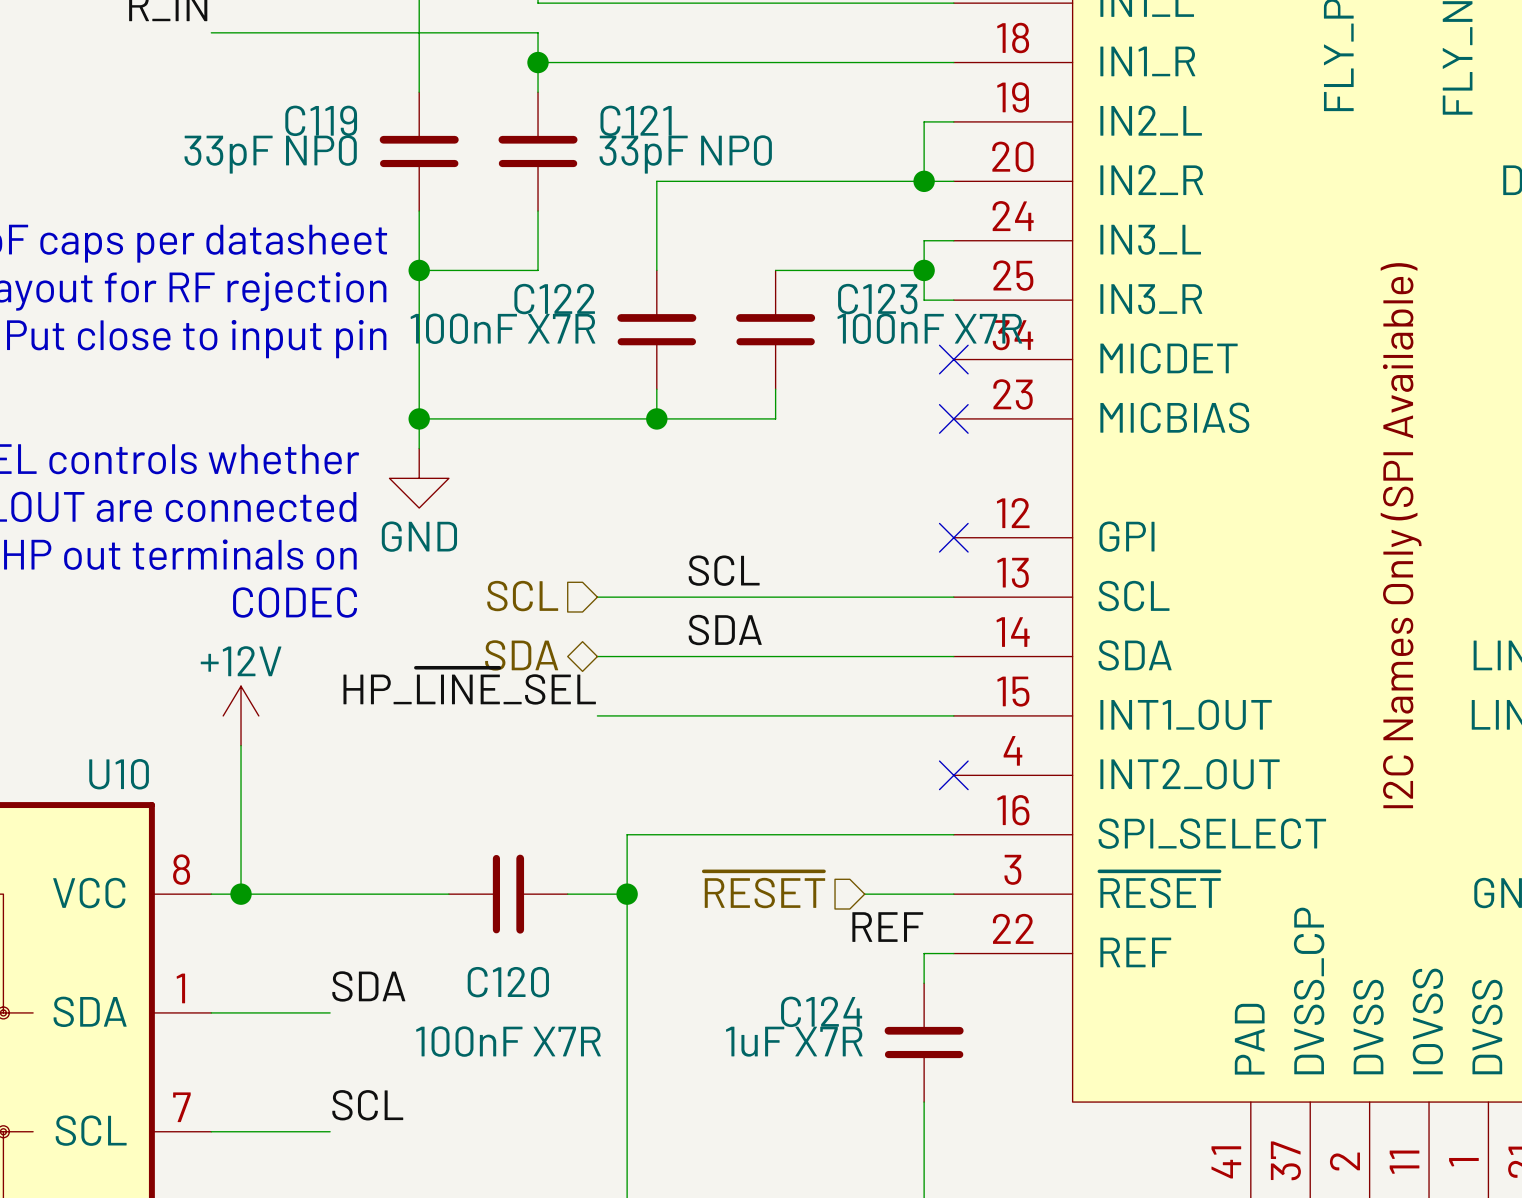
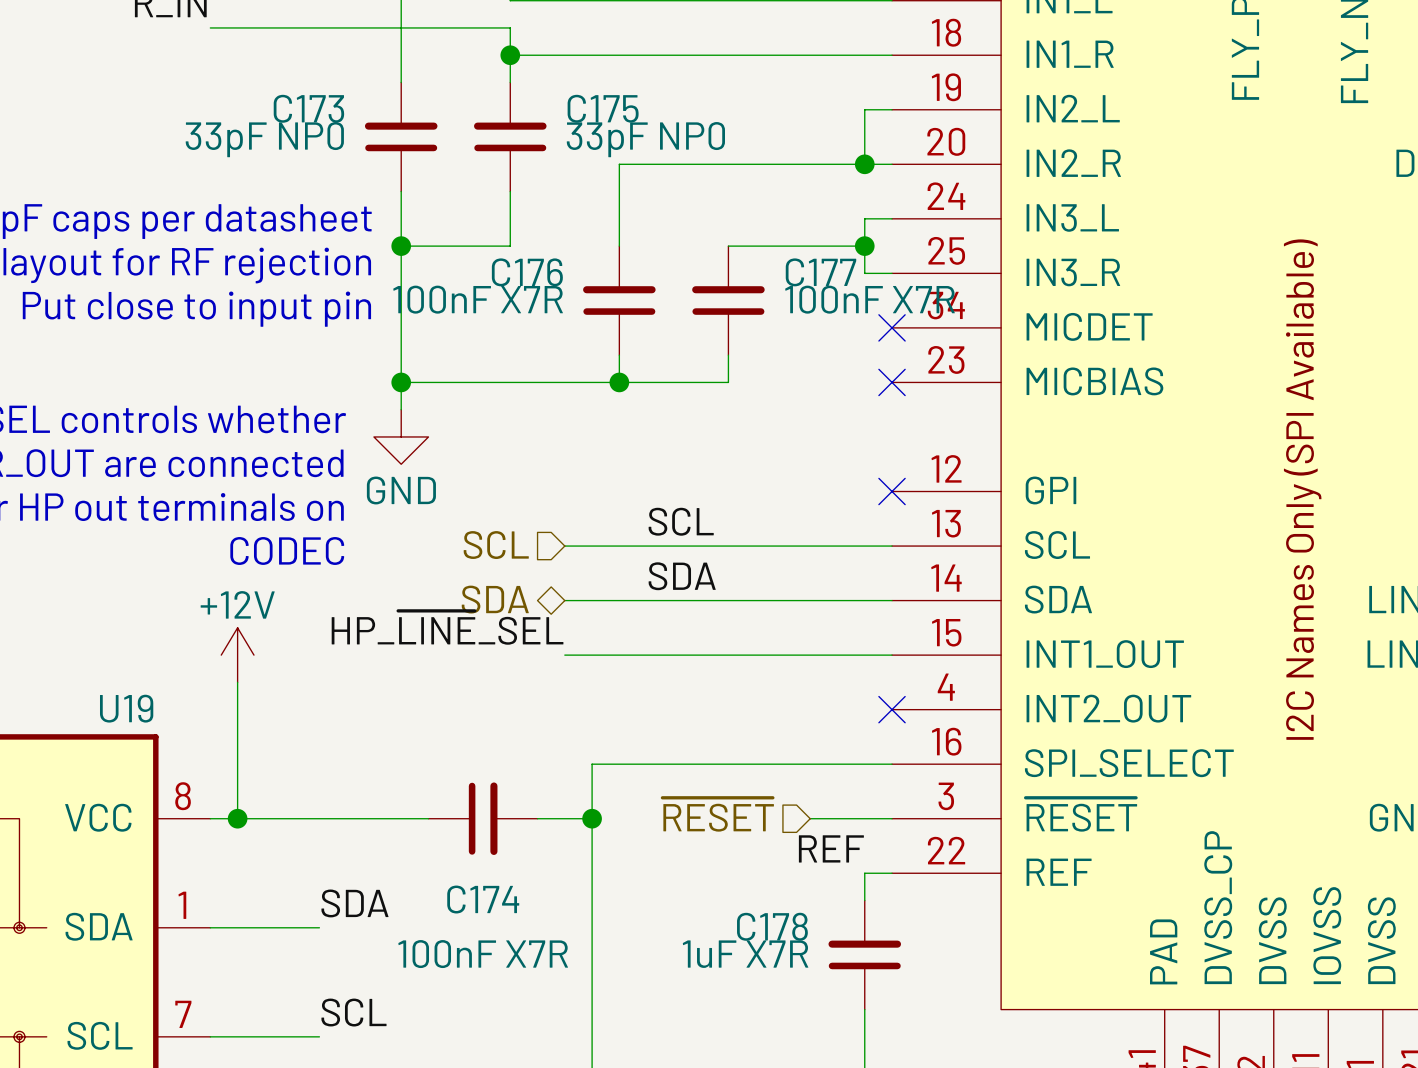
C119 name: C119 (321, 120) -> C173 (308, 108)
C121 name: C121 (636, 120) -> C175 (603, 108)
C122 name: C122 (554, 299) -> C176 (527, 272)
C123 name: C123 (877, 299) -> C177 (820, 272)
U10 name: U10 (119, 774) -> U19 (126, 708)
C120 name: C120 (508, 982) -> C174 (483, 899)
C124 name: C124 (821, 1011) -> C178 (772, 926)

